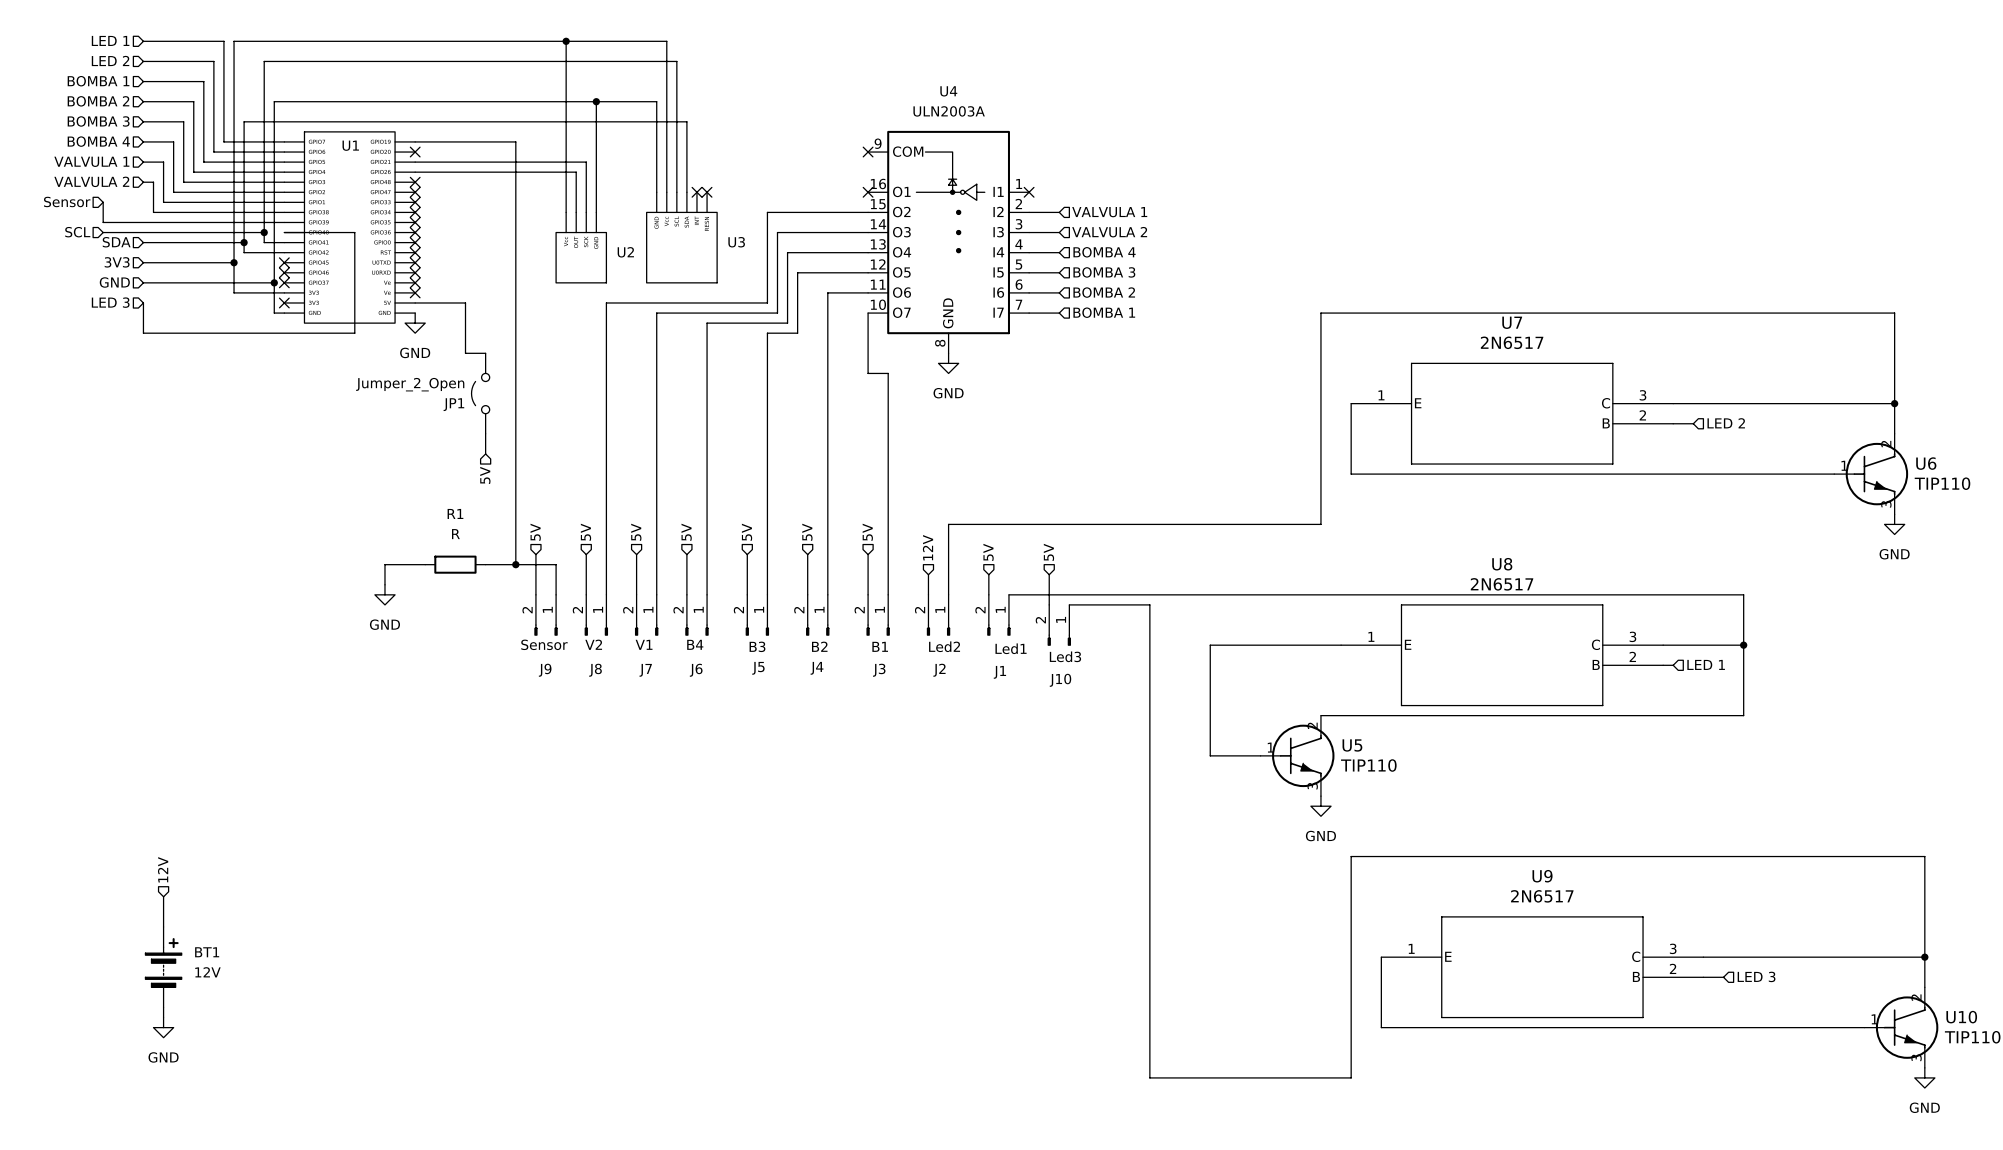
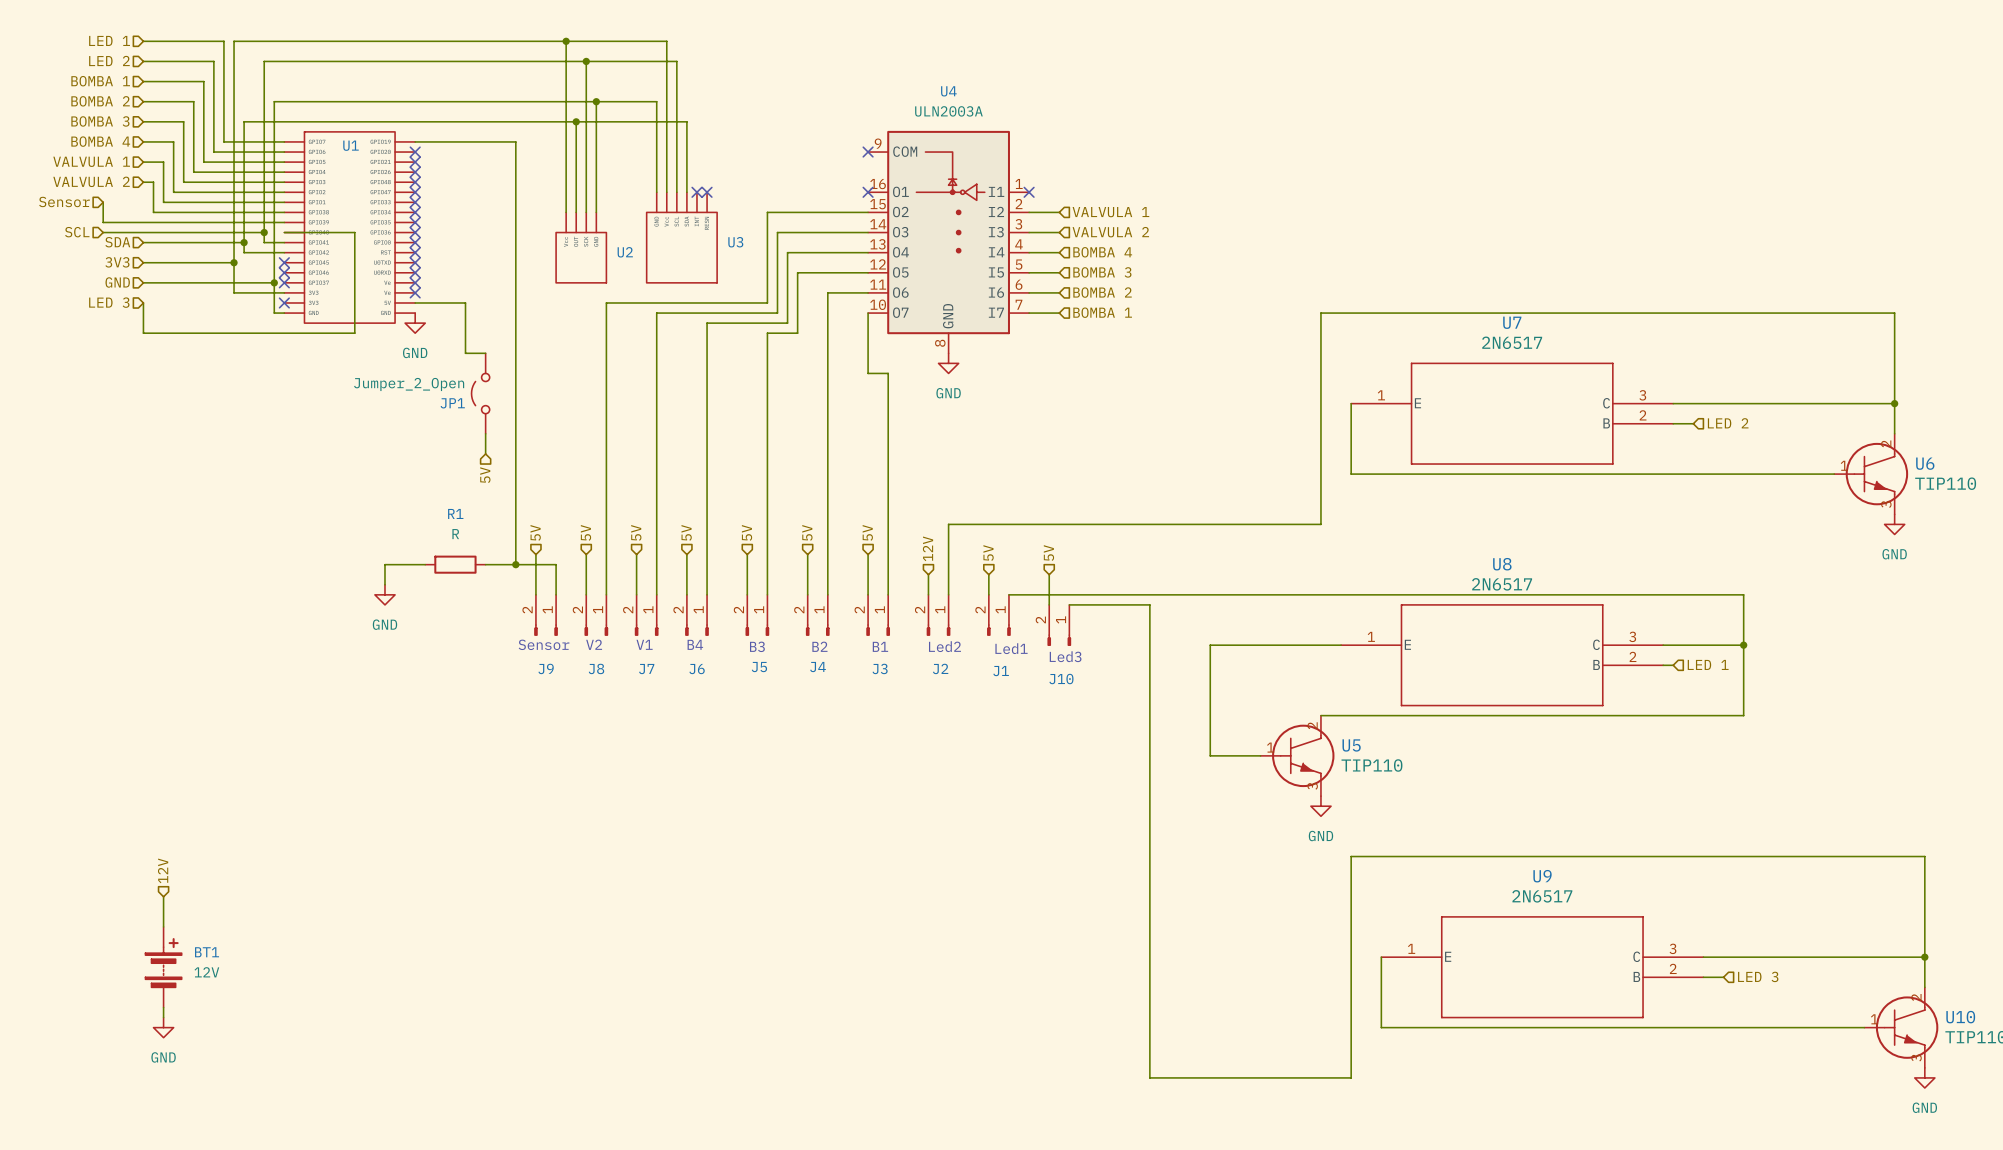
junction: none -> (586, 61)
junction: none -> (576, 121)
wire: (415, 162) (586, 162) -> (586, 61) (586, 162)
no-connect mark: none -> (415, 162)
wire: (415, 172) (576, 172) -> (576, 121) (576, 172)
no-connect mark: none -> (415, 172)

